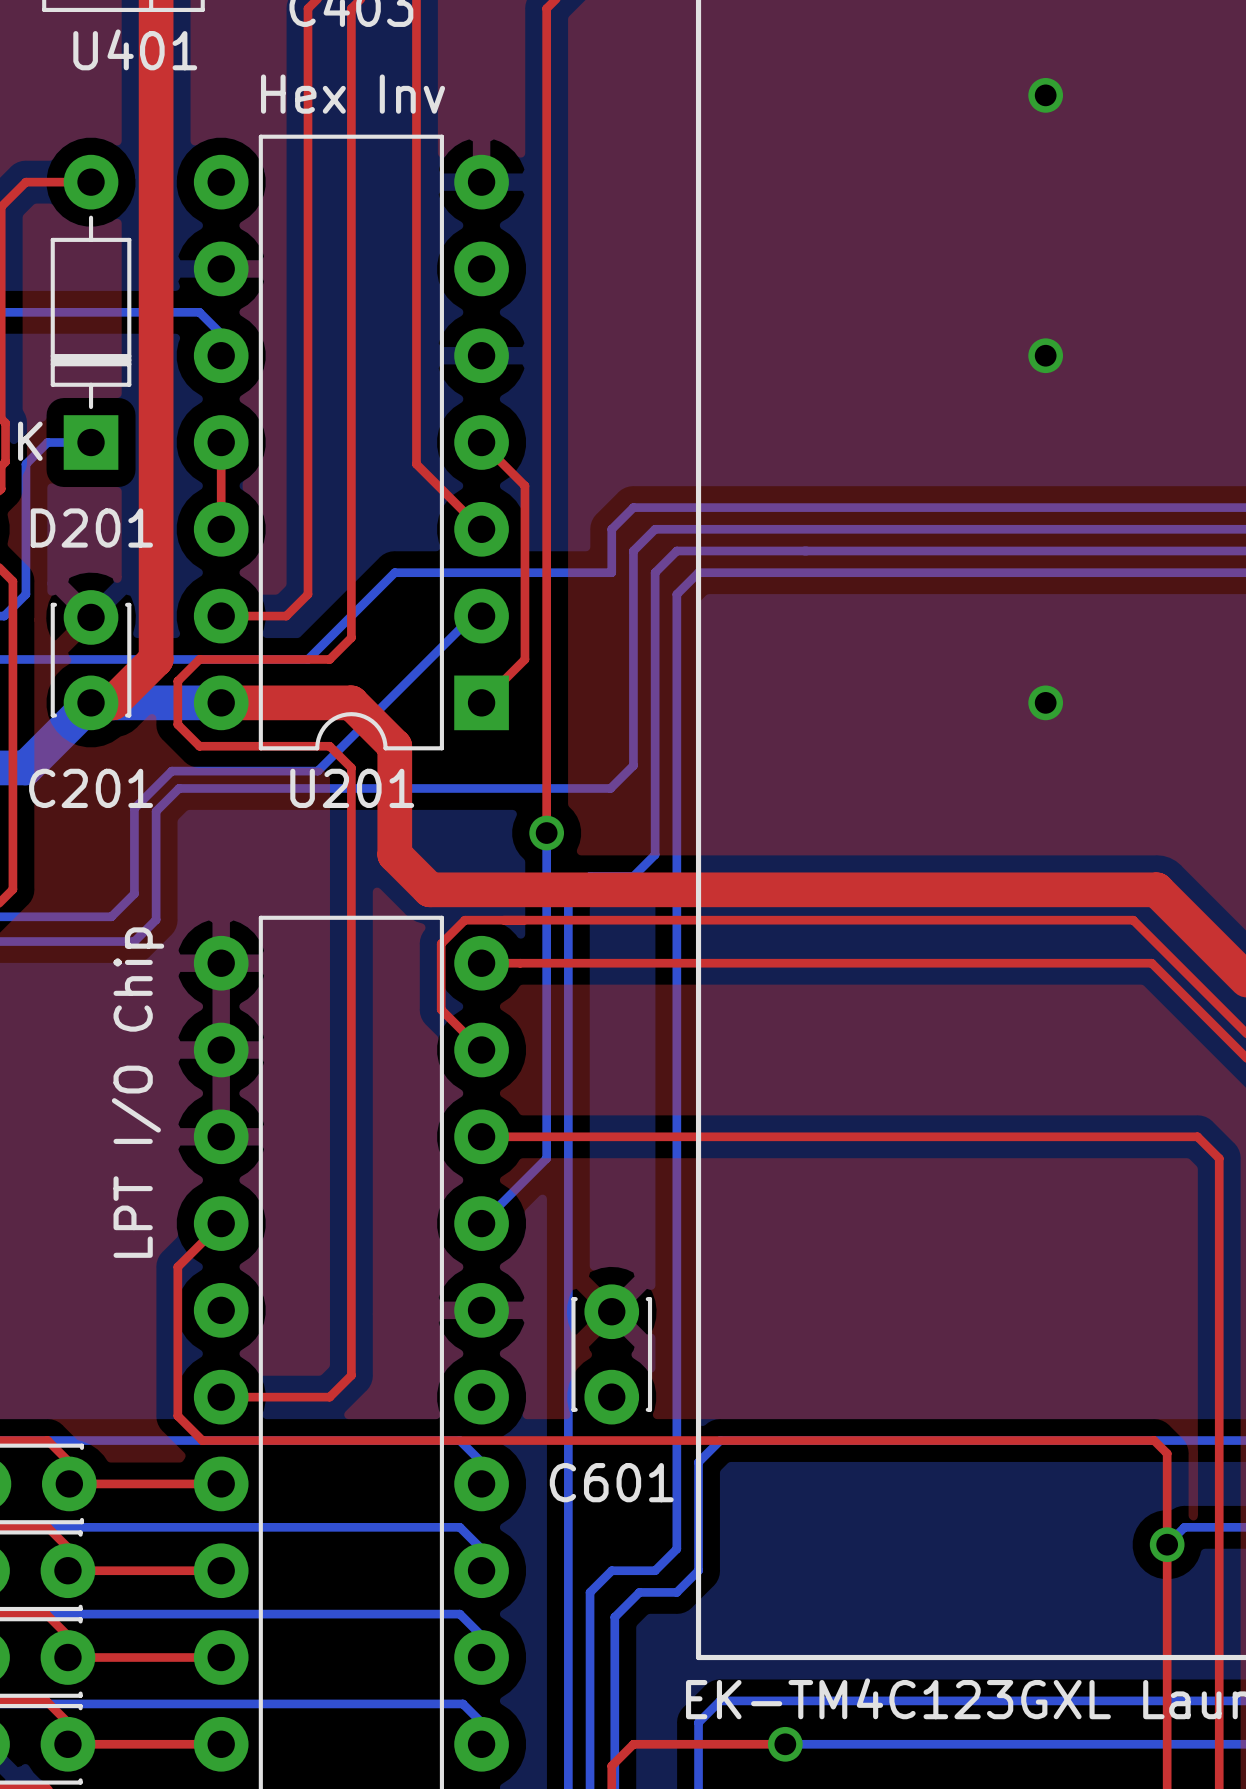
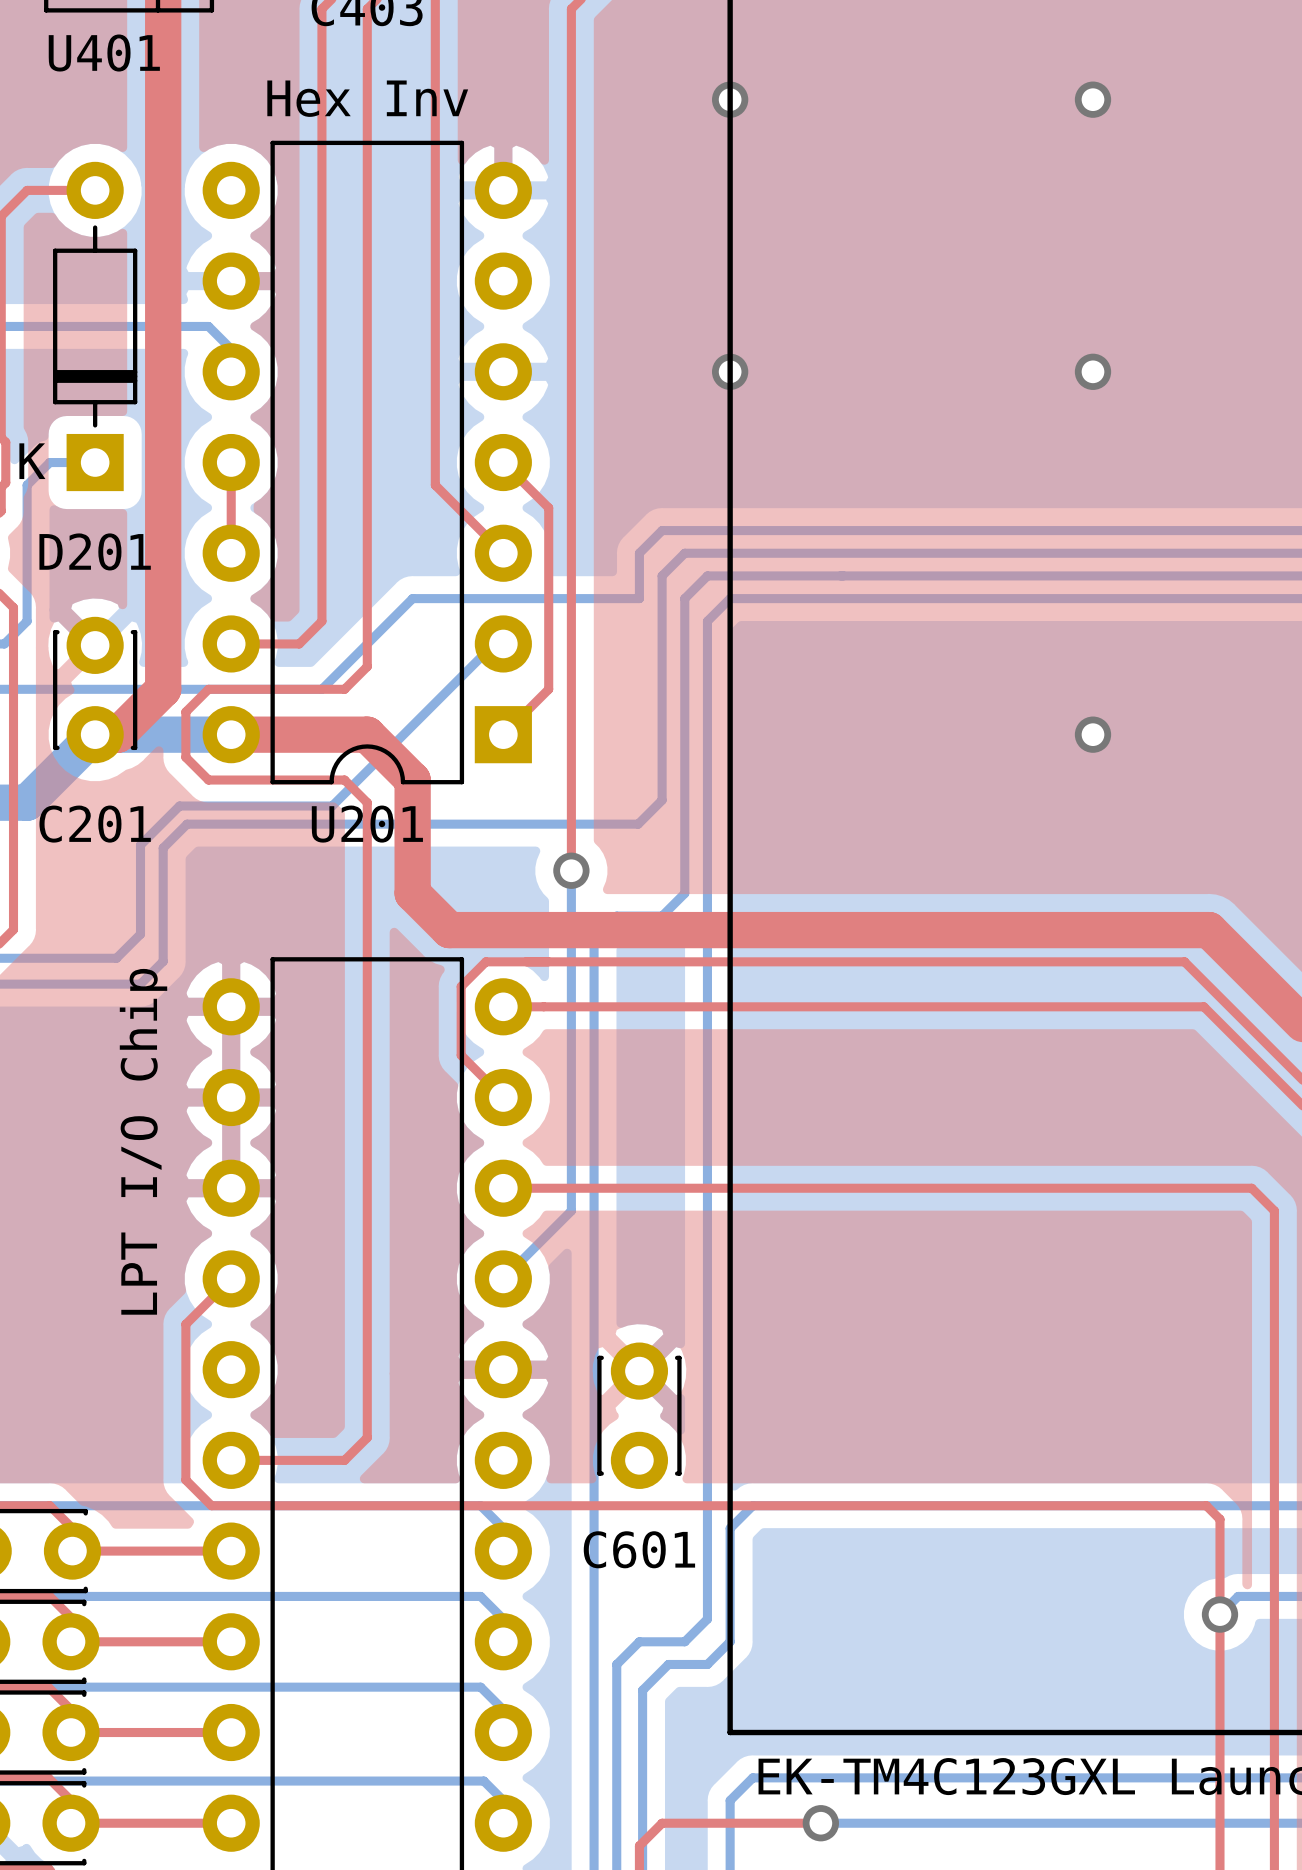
U401 name position: U401 (135, 49) -> U401 (104, 53)
via: none -> (730, 99)
via: none -> (730, 371)

